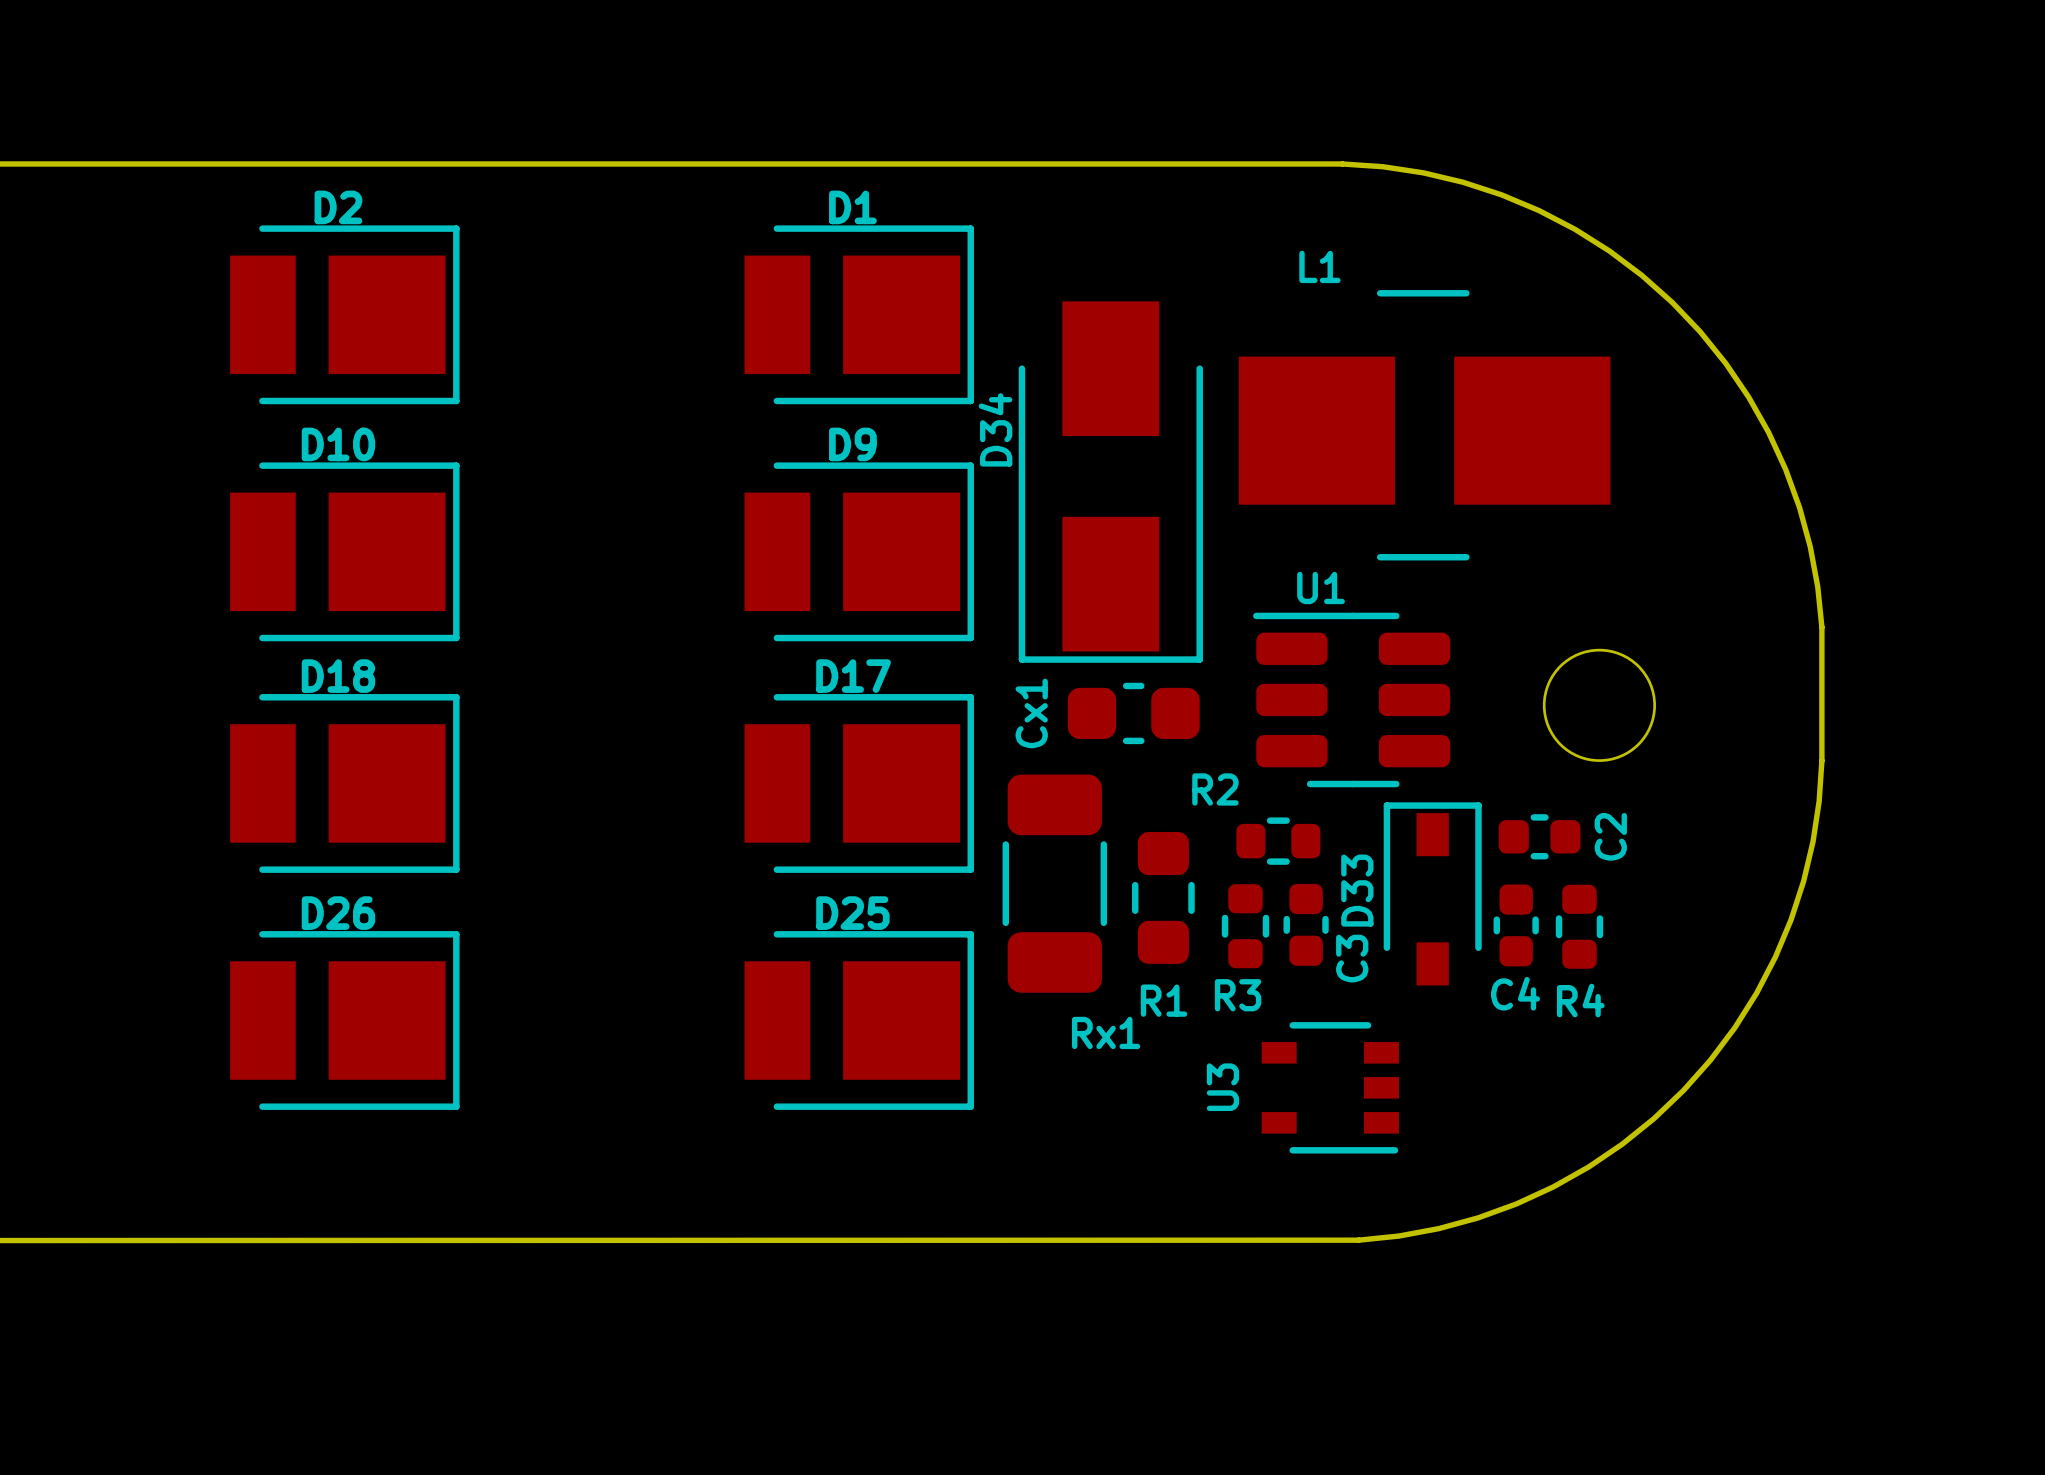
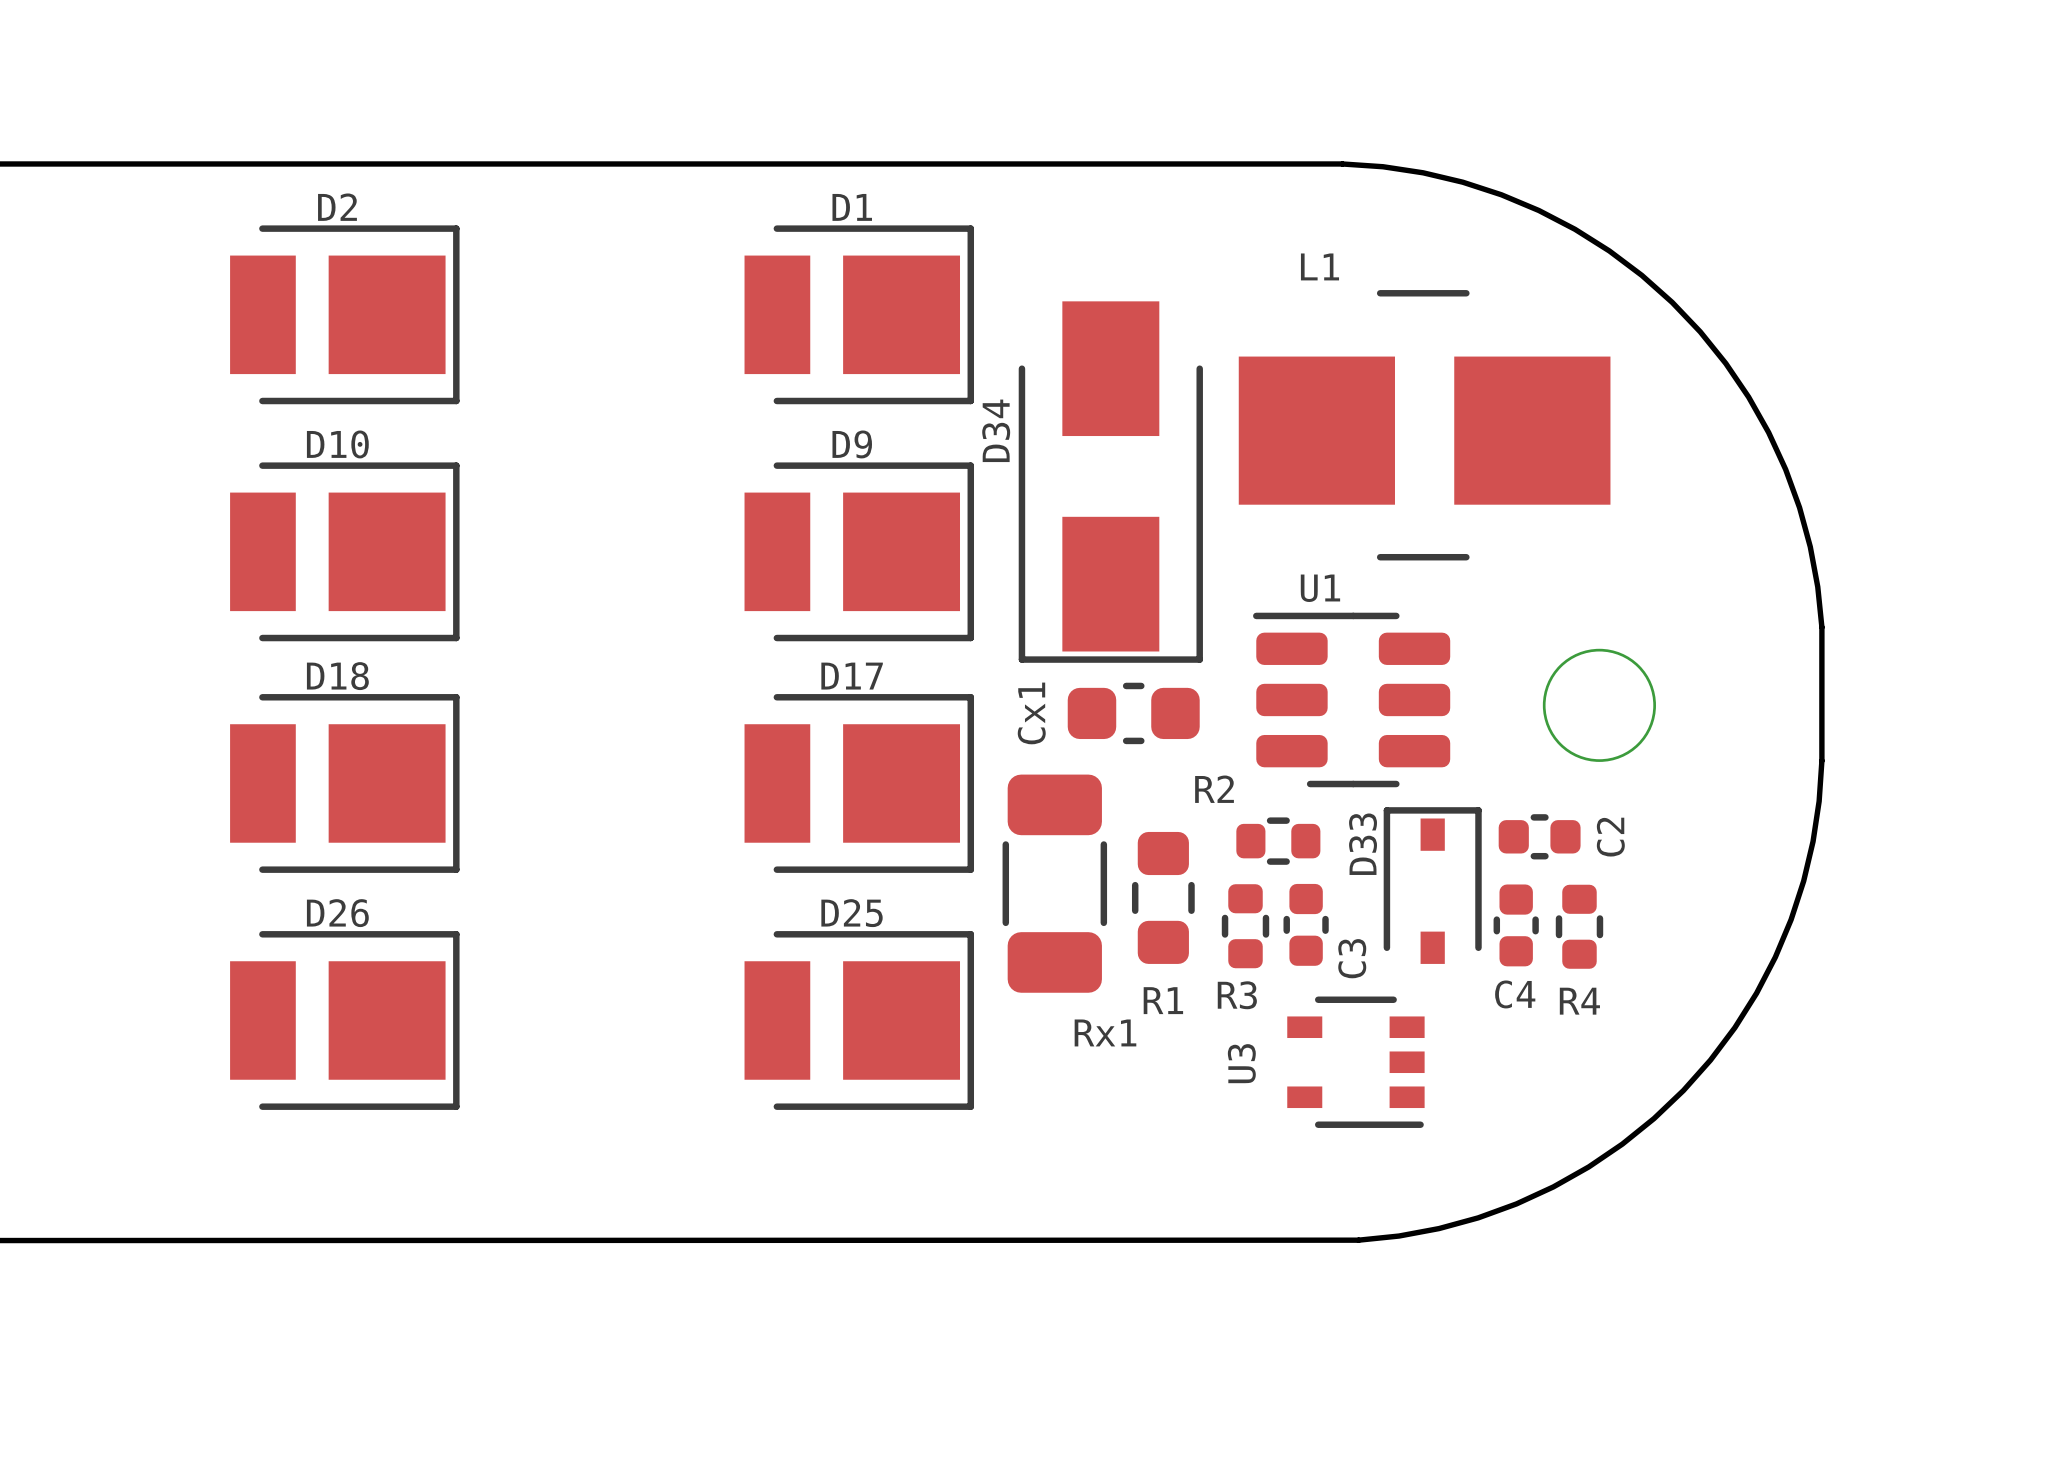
D33 footprint: [1383, 802, 1482, 986] -> [1383, 807, 1482, 964]
D33 name position: D33 (1357, 890) -> D33 (1363, 844)
U3 name position: U3 (1222, 1087) -> U3 (1241, 1063)
U3 position: (1330, 1087) -> (1355, 1062)

